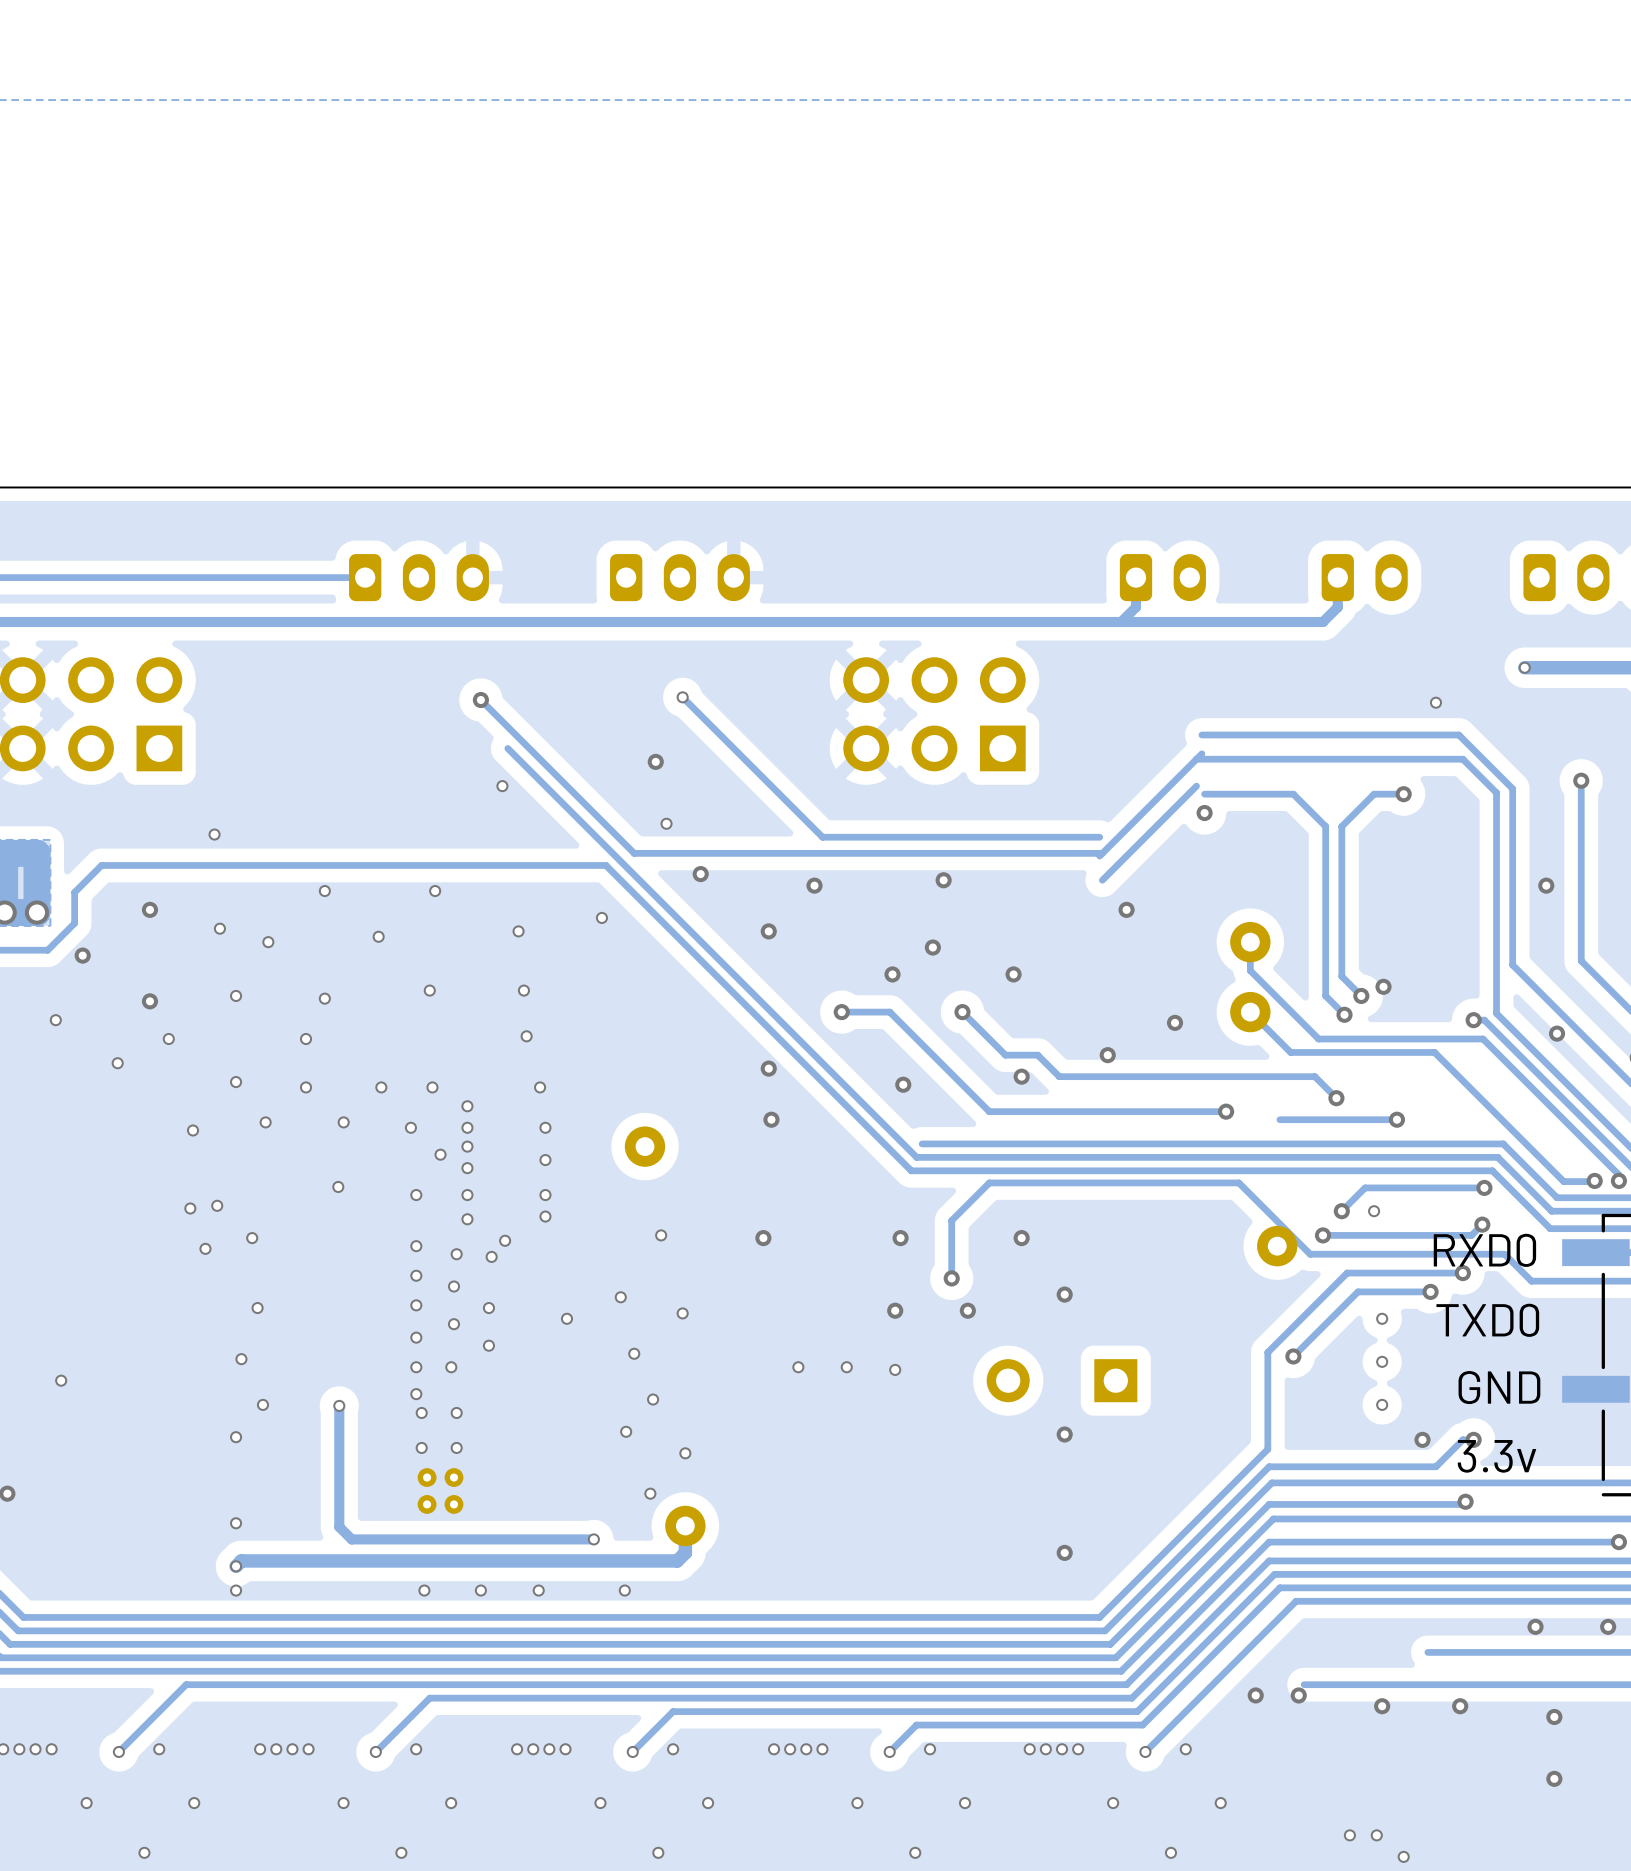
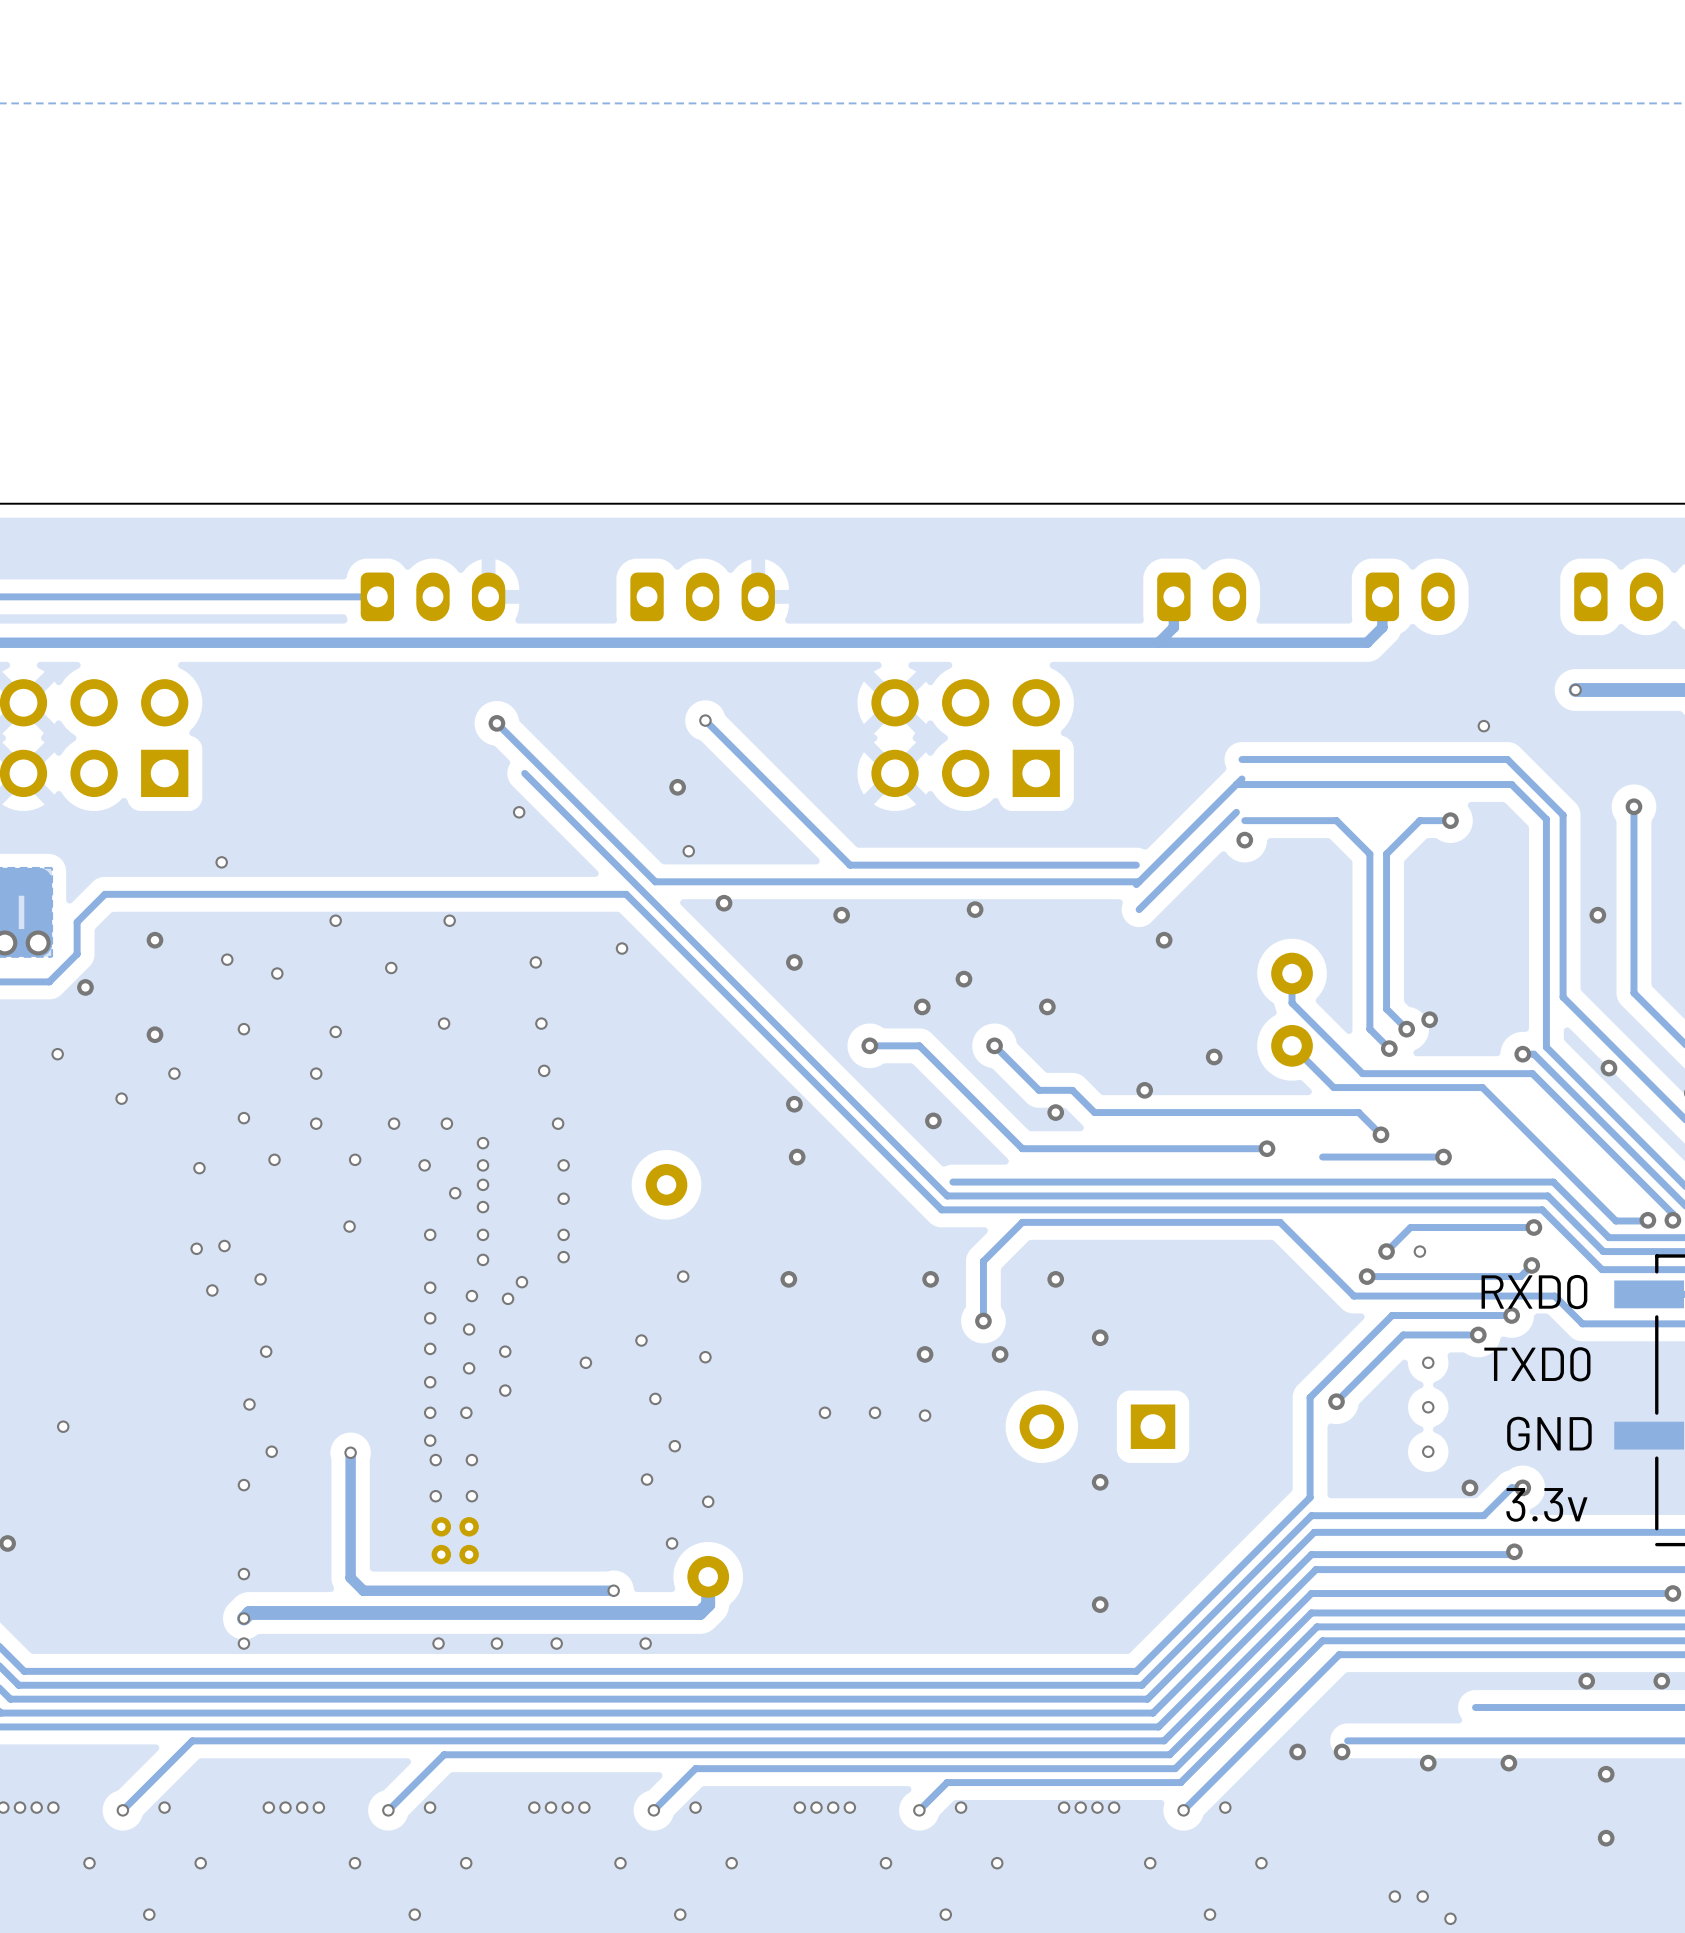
part: (1277, 1246) -> none

